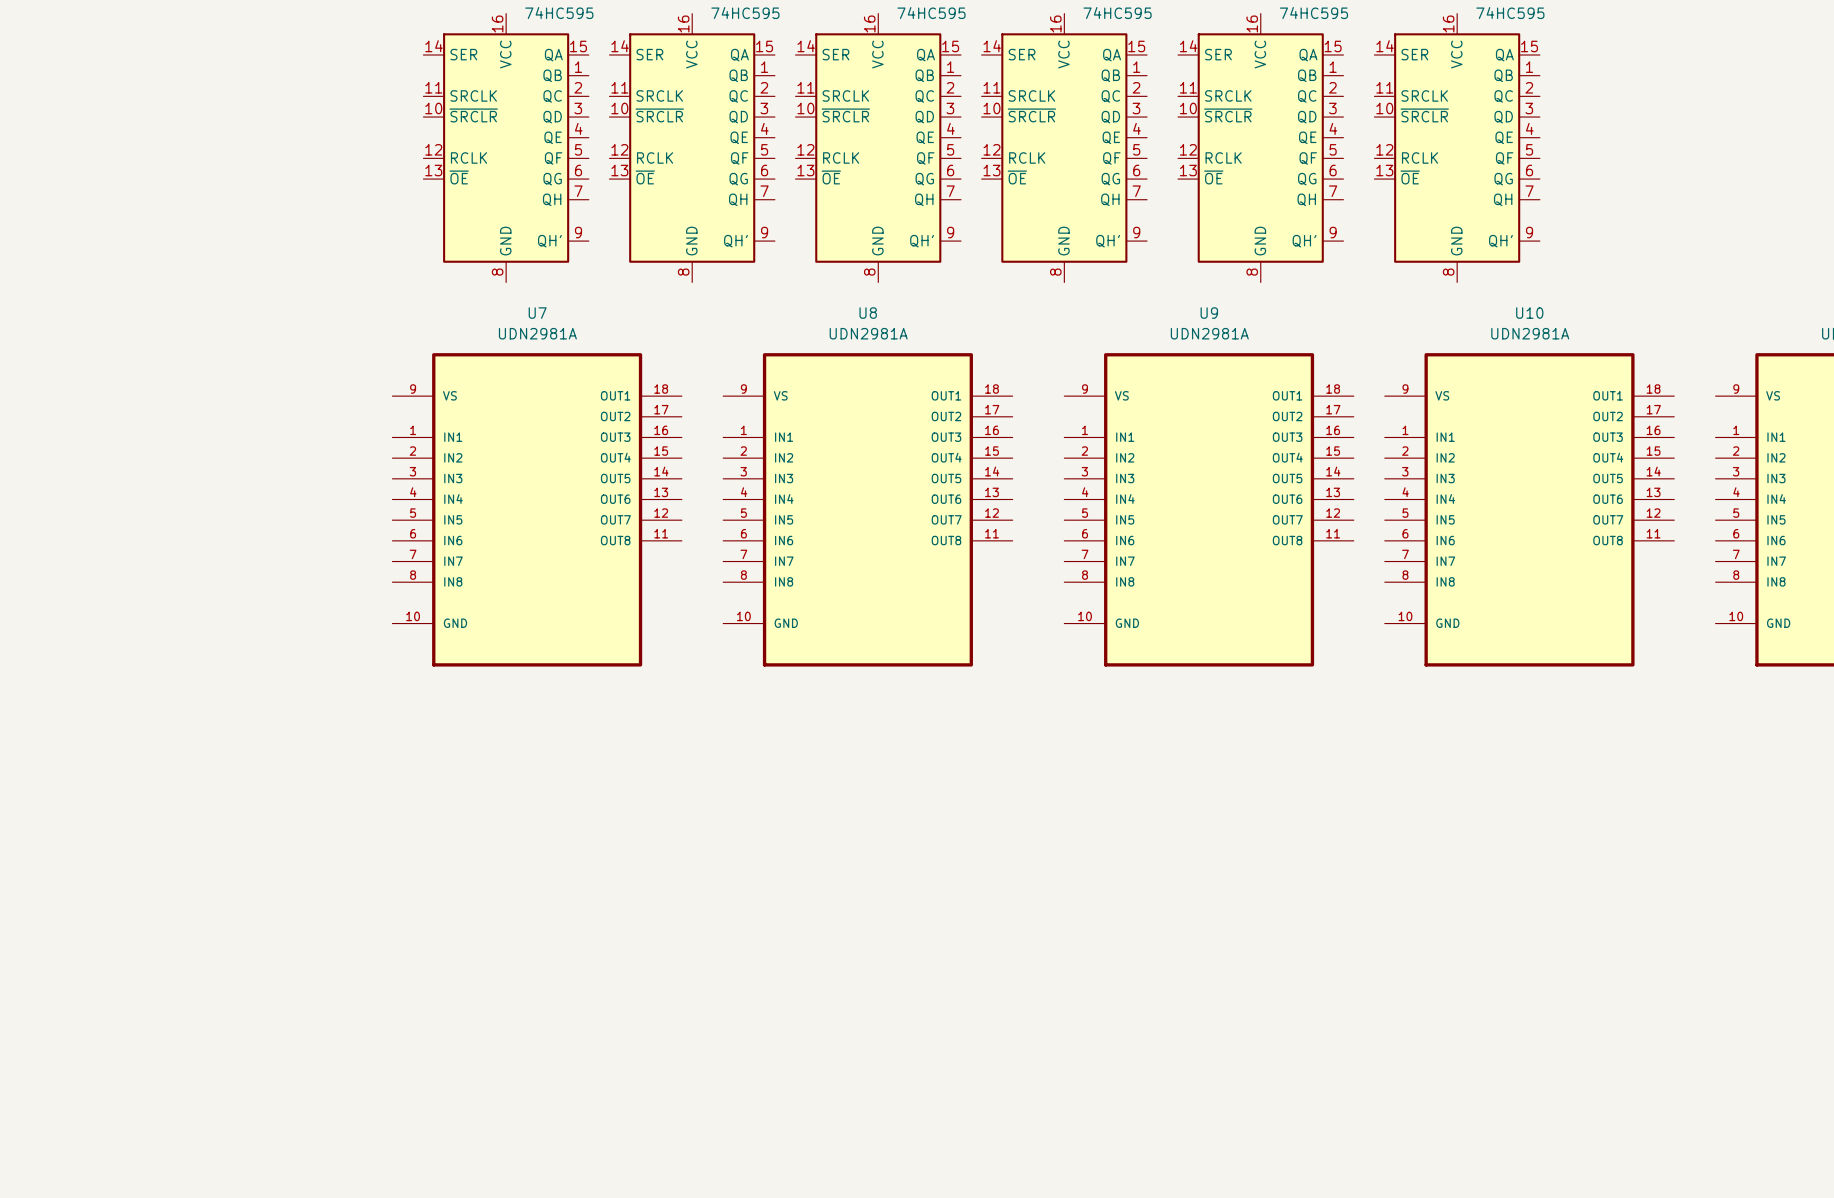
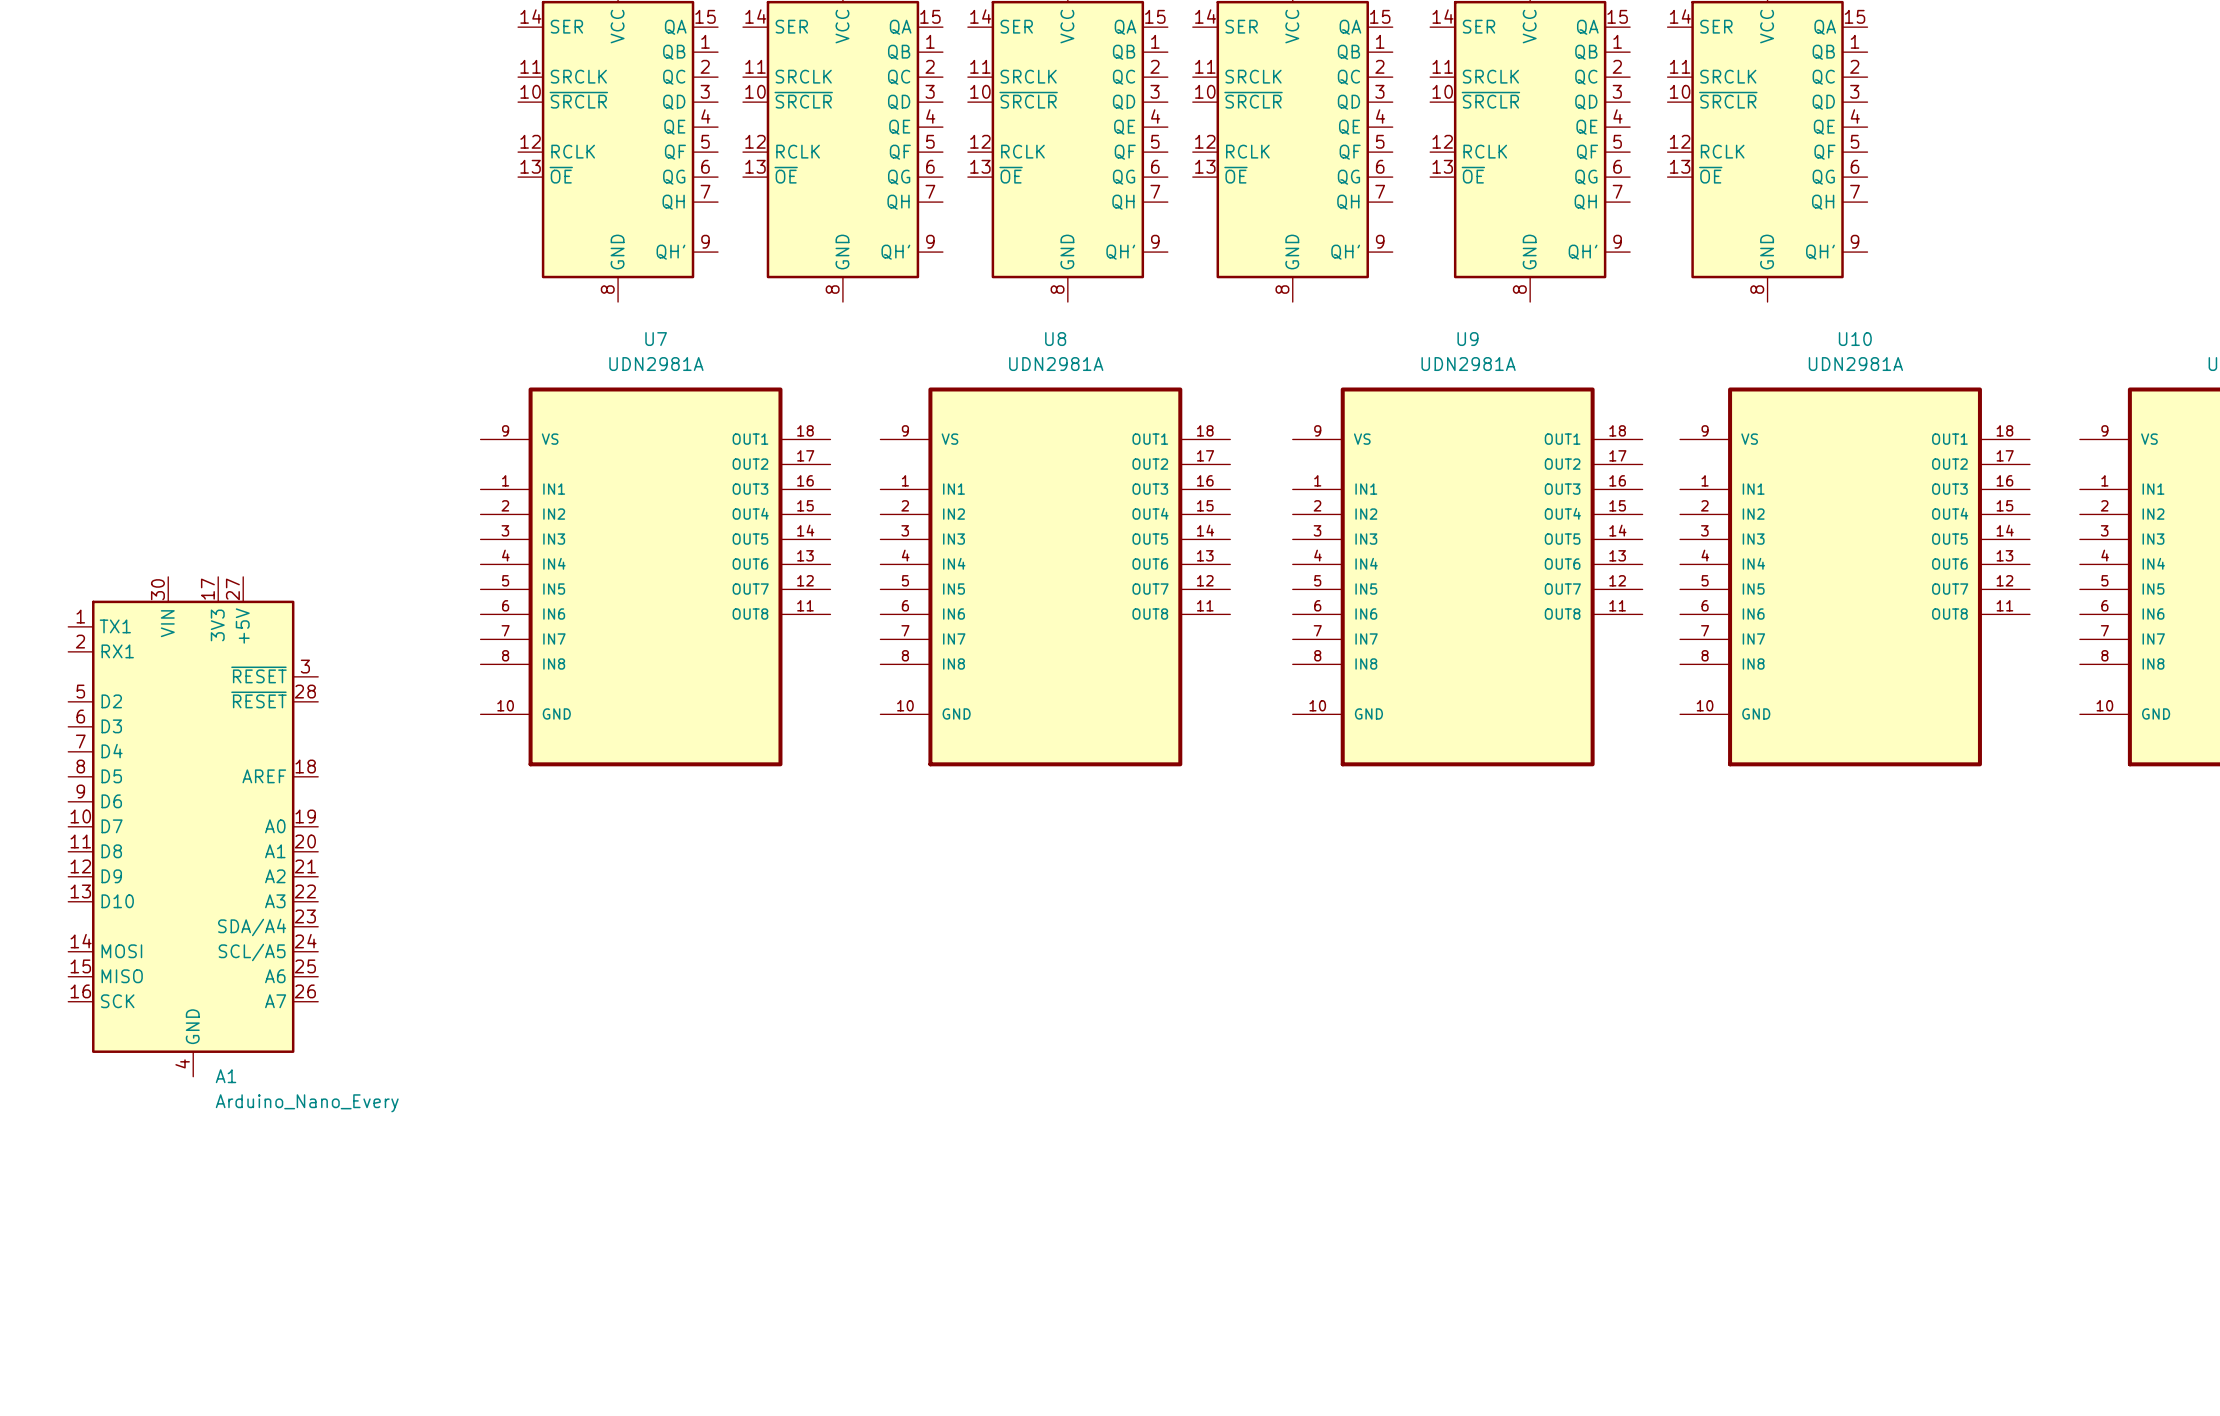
A1: none -> Arduino_Nano_Every (193, 826)

